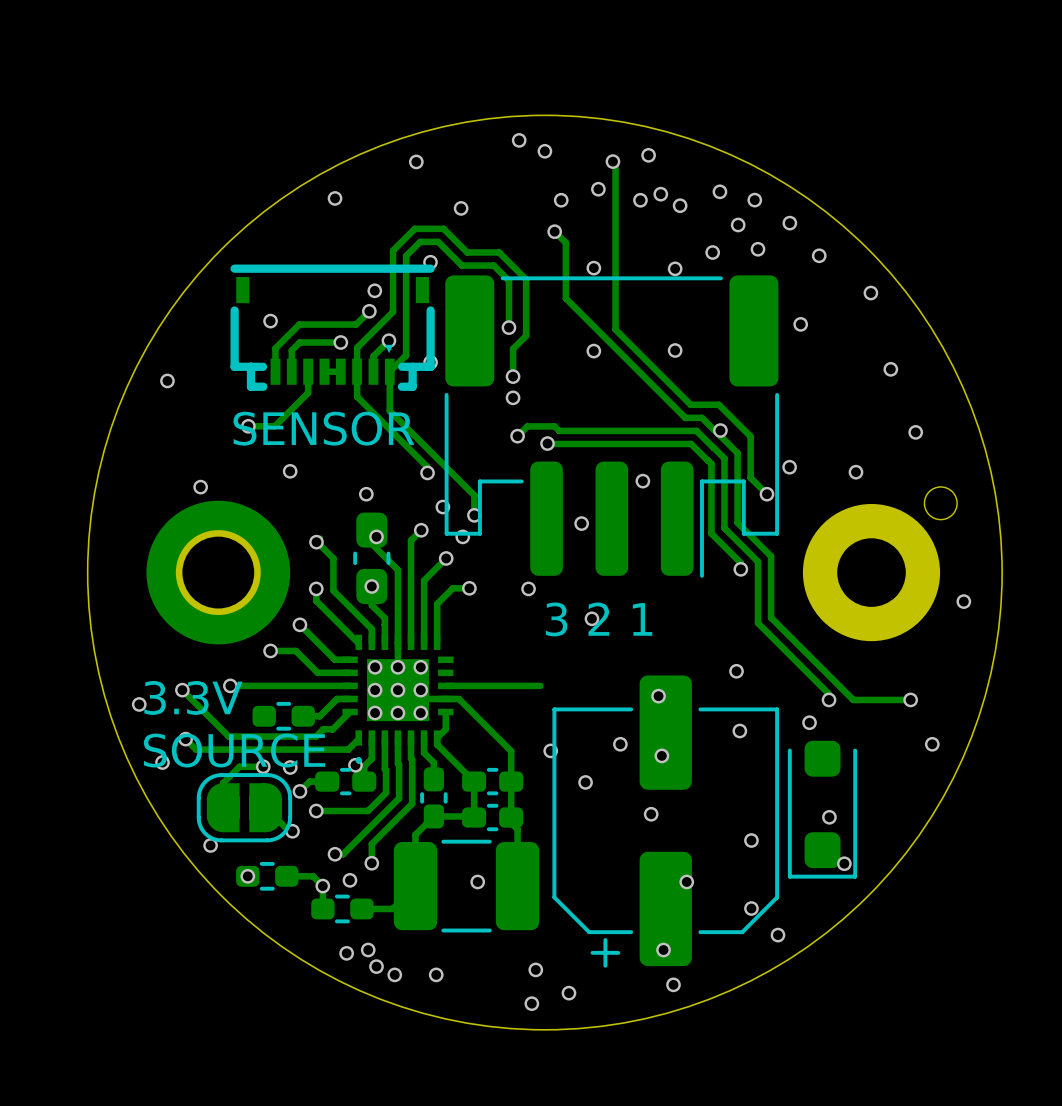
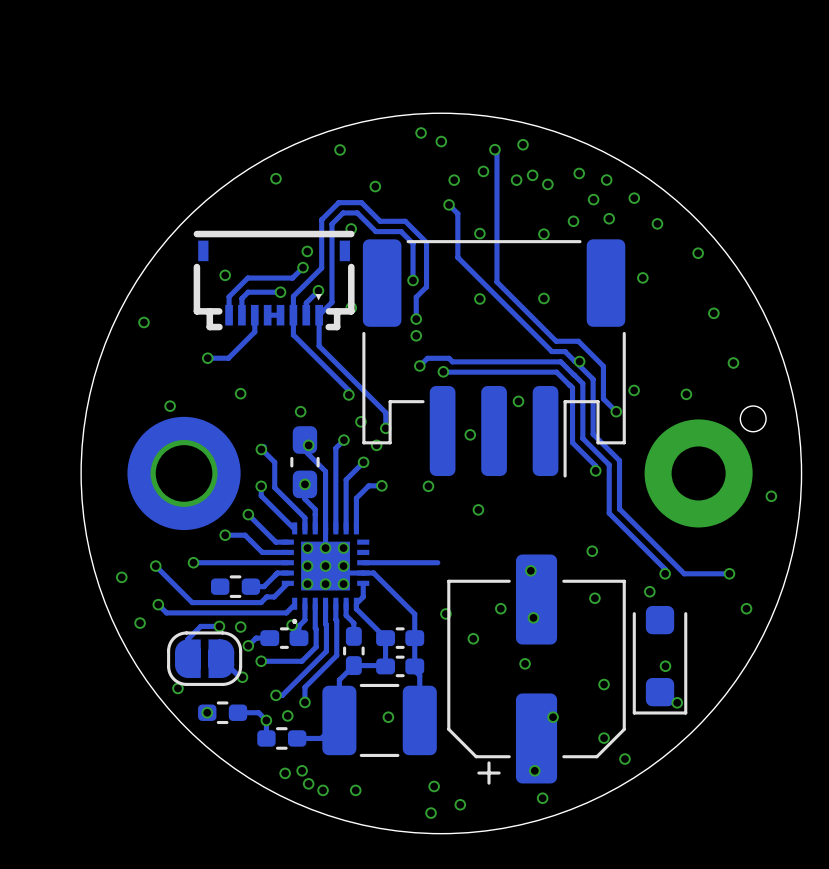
text: SENSOR (323, 428) -> none
text: 3 2 1 (599, 619) -> none
text: 3.3V (193, 697) -> none
text: SOURCE (234, 750) -> none

